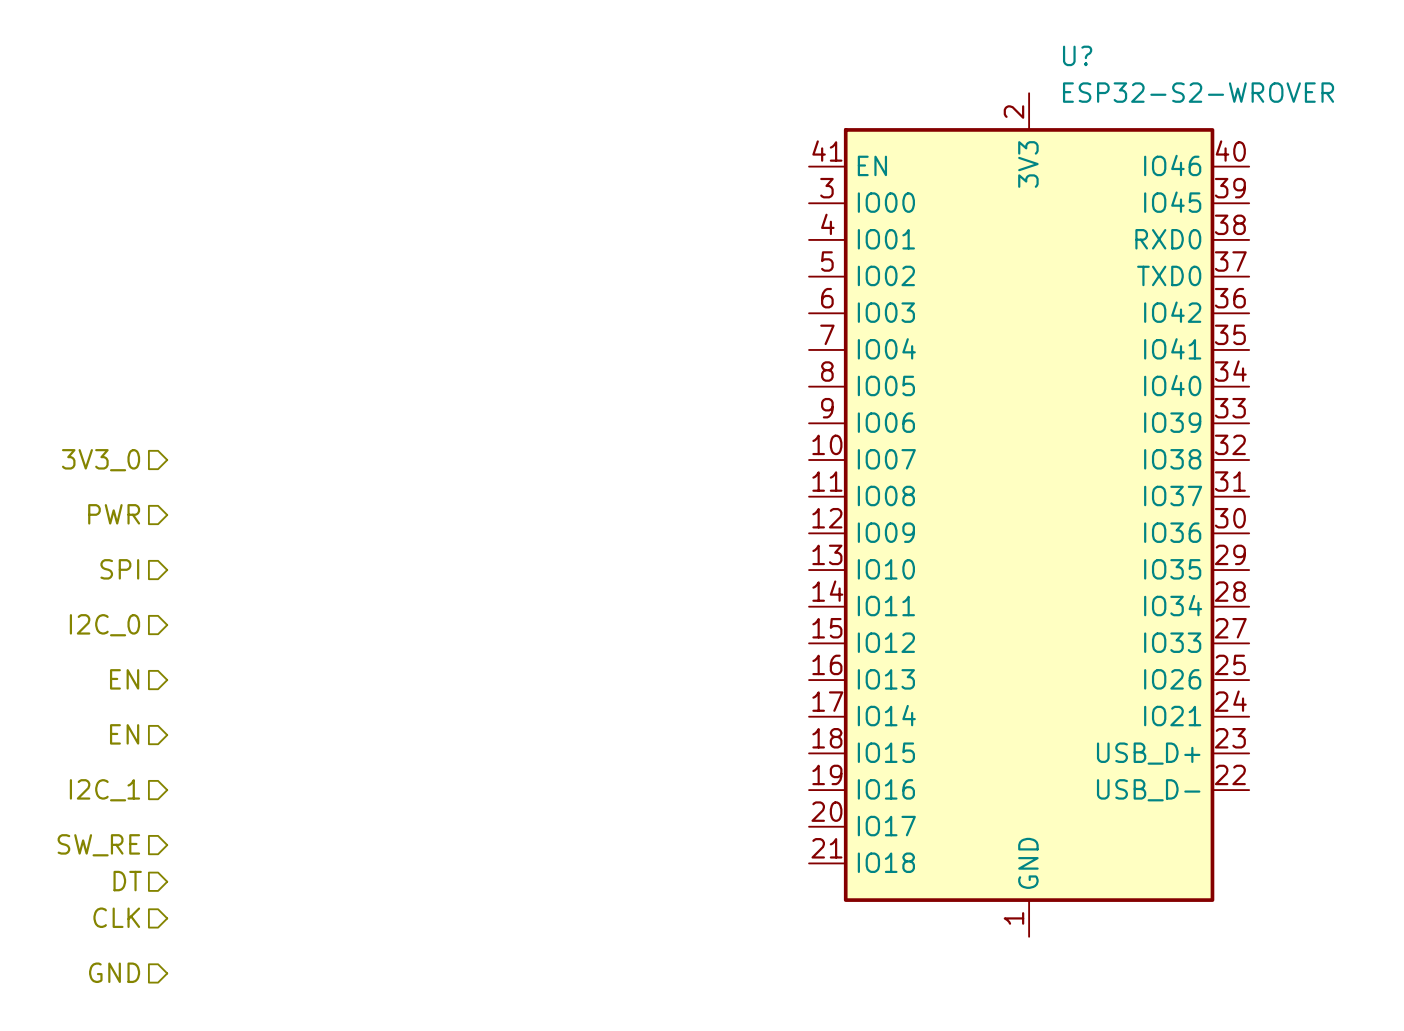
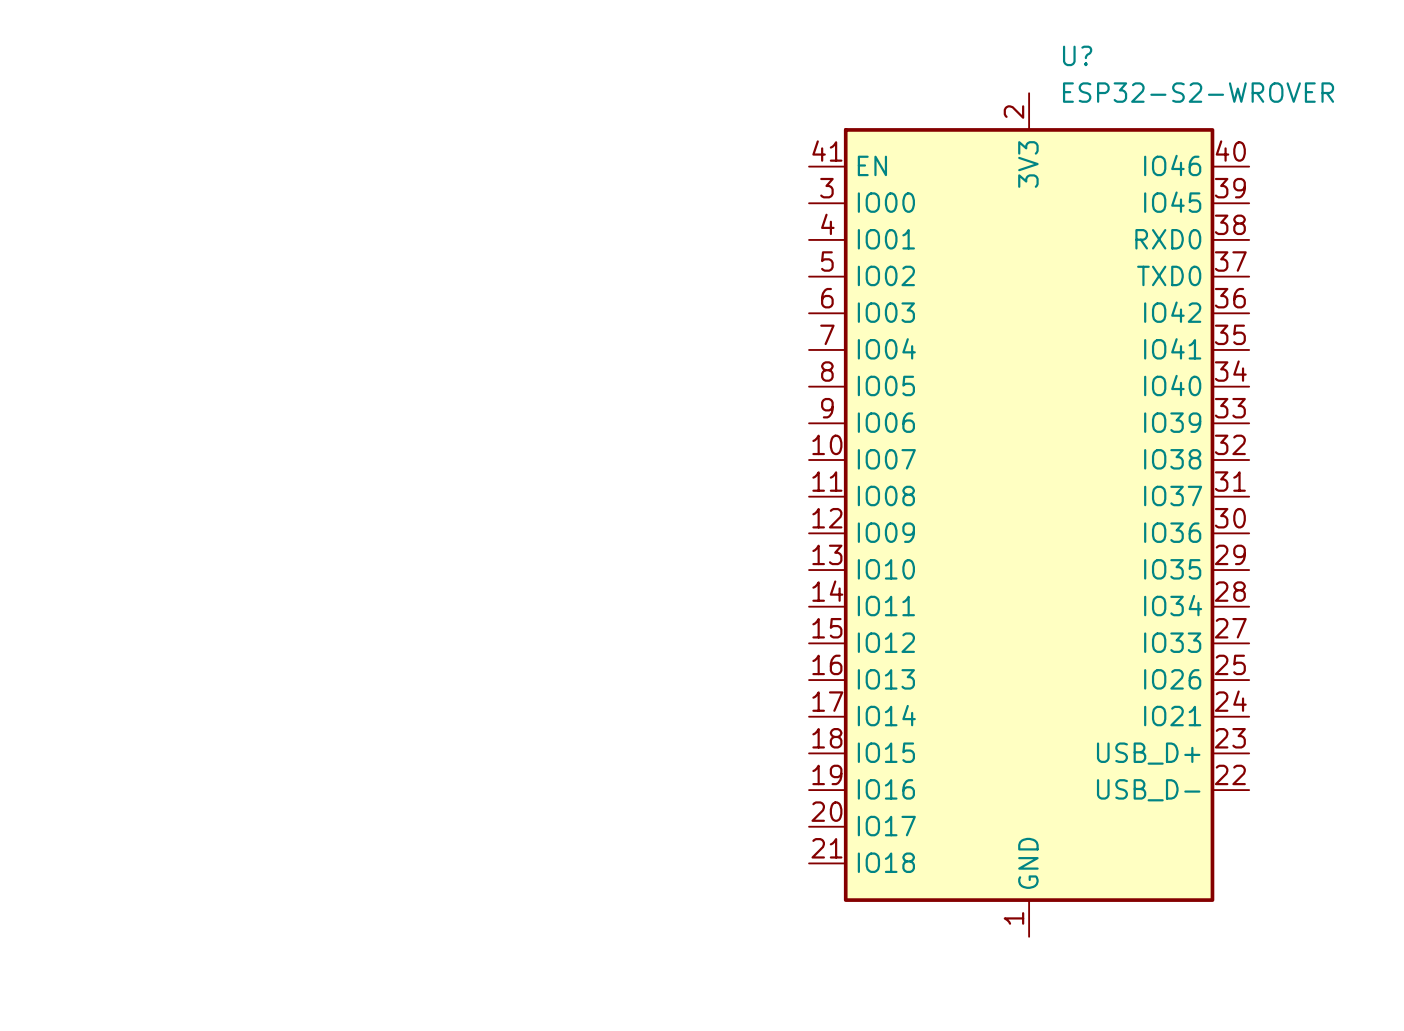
hierarchical label: 3V3_0 (101, 460) -> none
hierarchical label: PWR (114, 514) -> none
hierarchical label: SPI (119, 569) -> none
hierarchical label: I2C_0 (104, 625) -> none
hierarchical label: EN (124, 679) -> none
hierarchical label: EN (124, 734) -> none
hierarchical label: I2C_1 (104, 790) -> none
hierarchical label: SW_RE (98, 845) -> none
hierarchical label: DT (127, 881) -> none
hierarchical label: CLK (116, 917) -> none
hierarchical label: GND (114, 972) -> none

